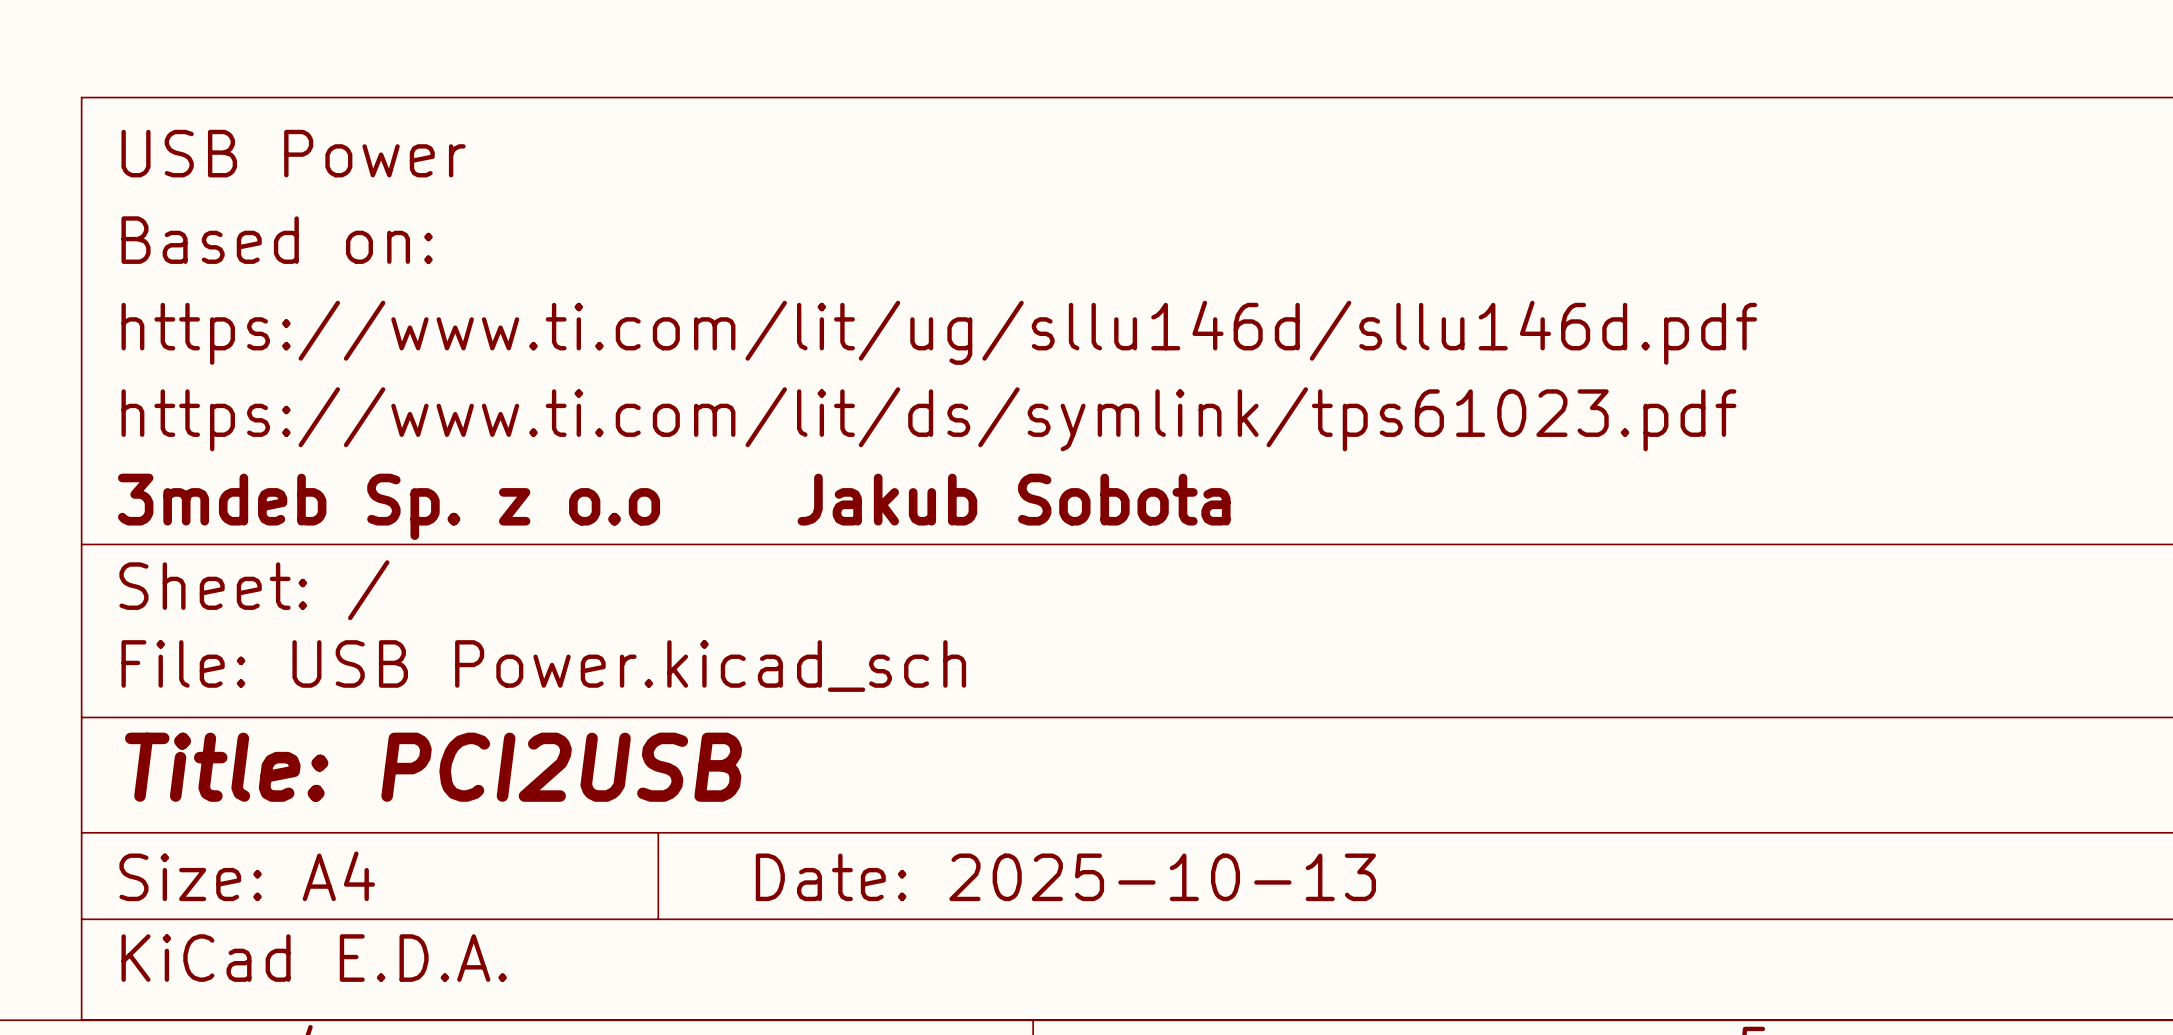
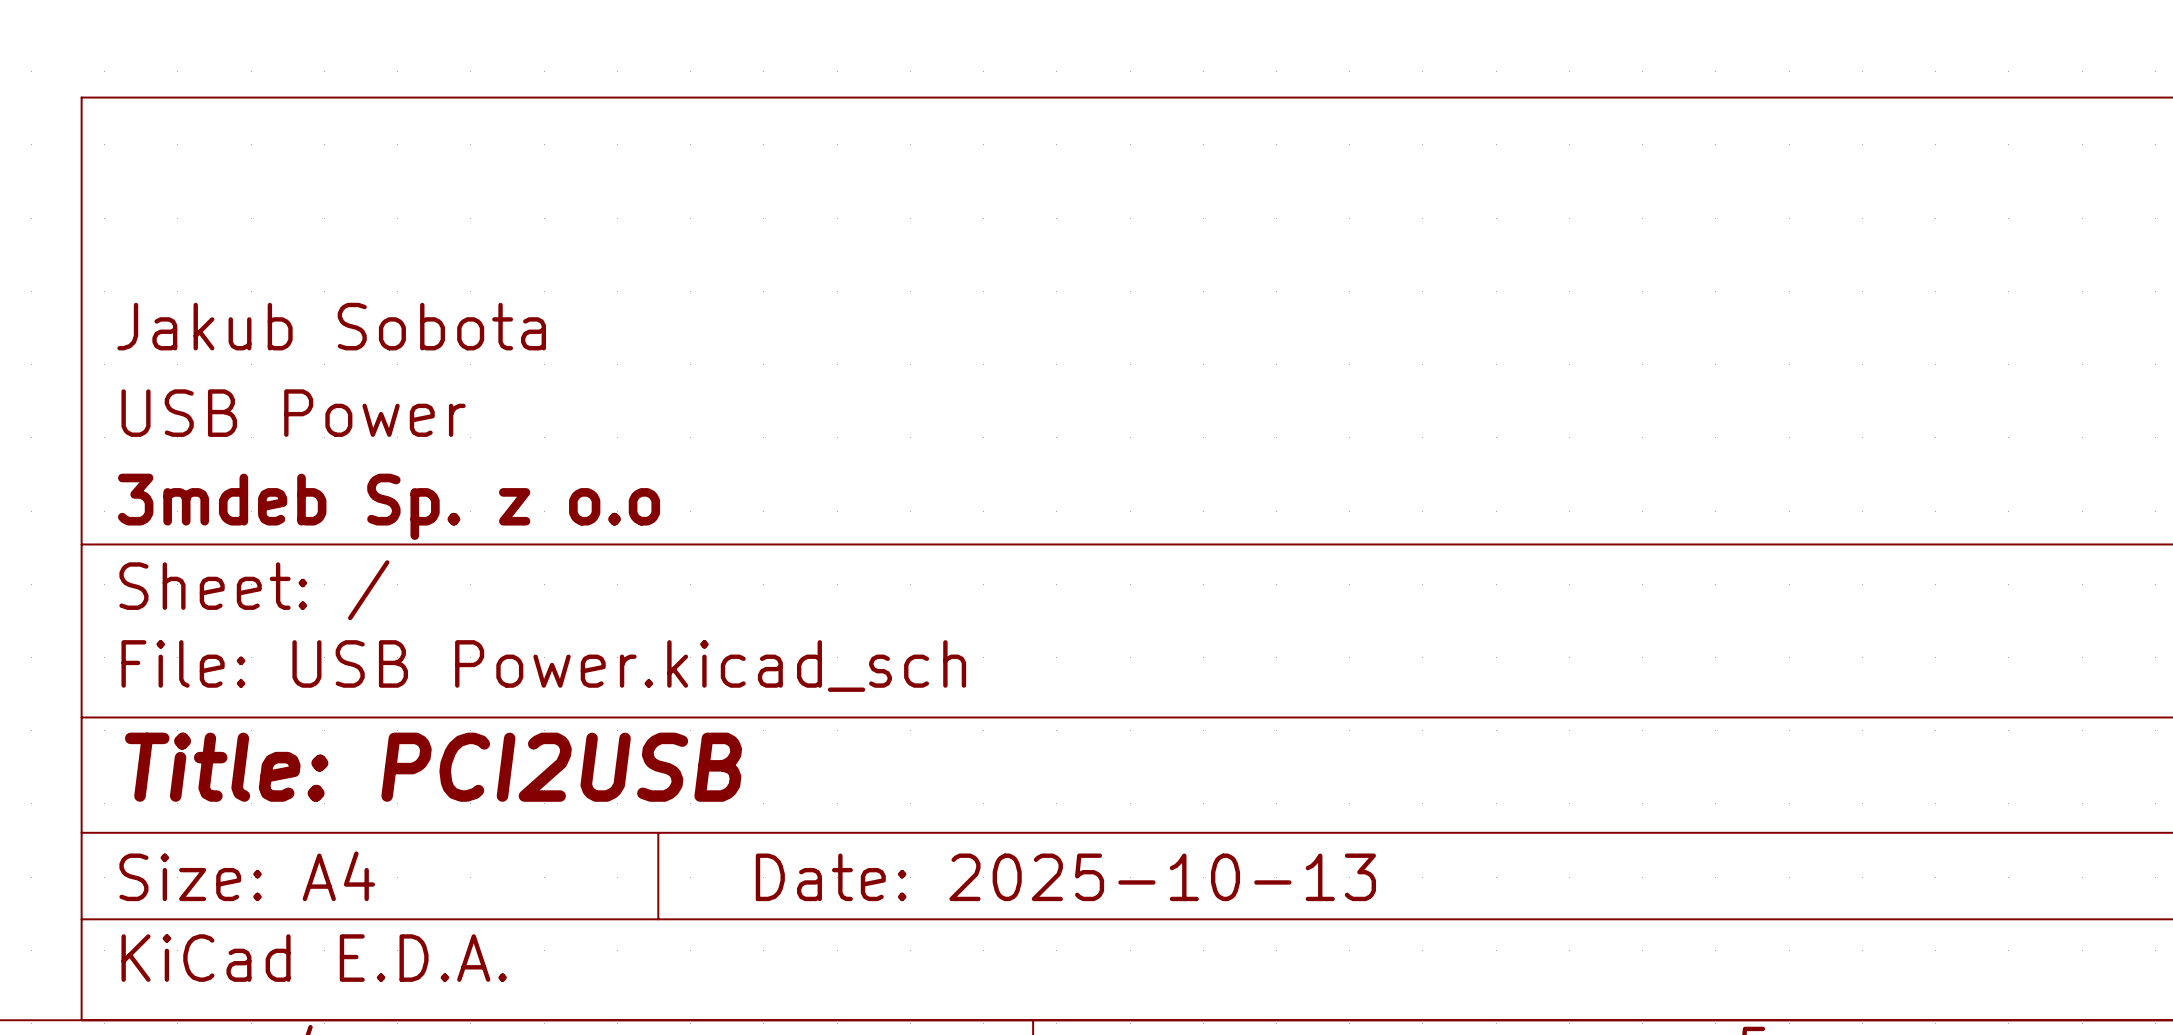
title block: USB Power (293, 153) -> none
title block: Based on: (277, 240) -> none
title block: https://www.ti.com/lit/ug/sllu146d/sllu146d.pdf (939, 332) -> Jakub Sobota (331, 326)
title block: https://www.ti.com/lit/ds/symlink/tps61023.pdf (928, 419) -> USB Power (293, 413)
title block: 3mdeb Sp. z o.o Jakub Sobota (674, 506) -> 3mdeb Sp. z o.o (389, 506)

